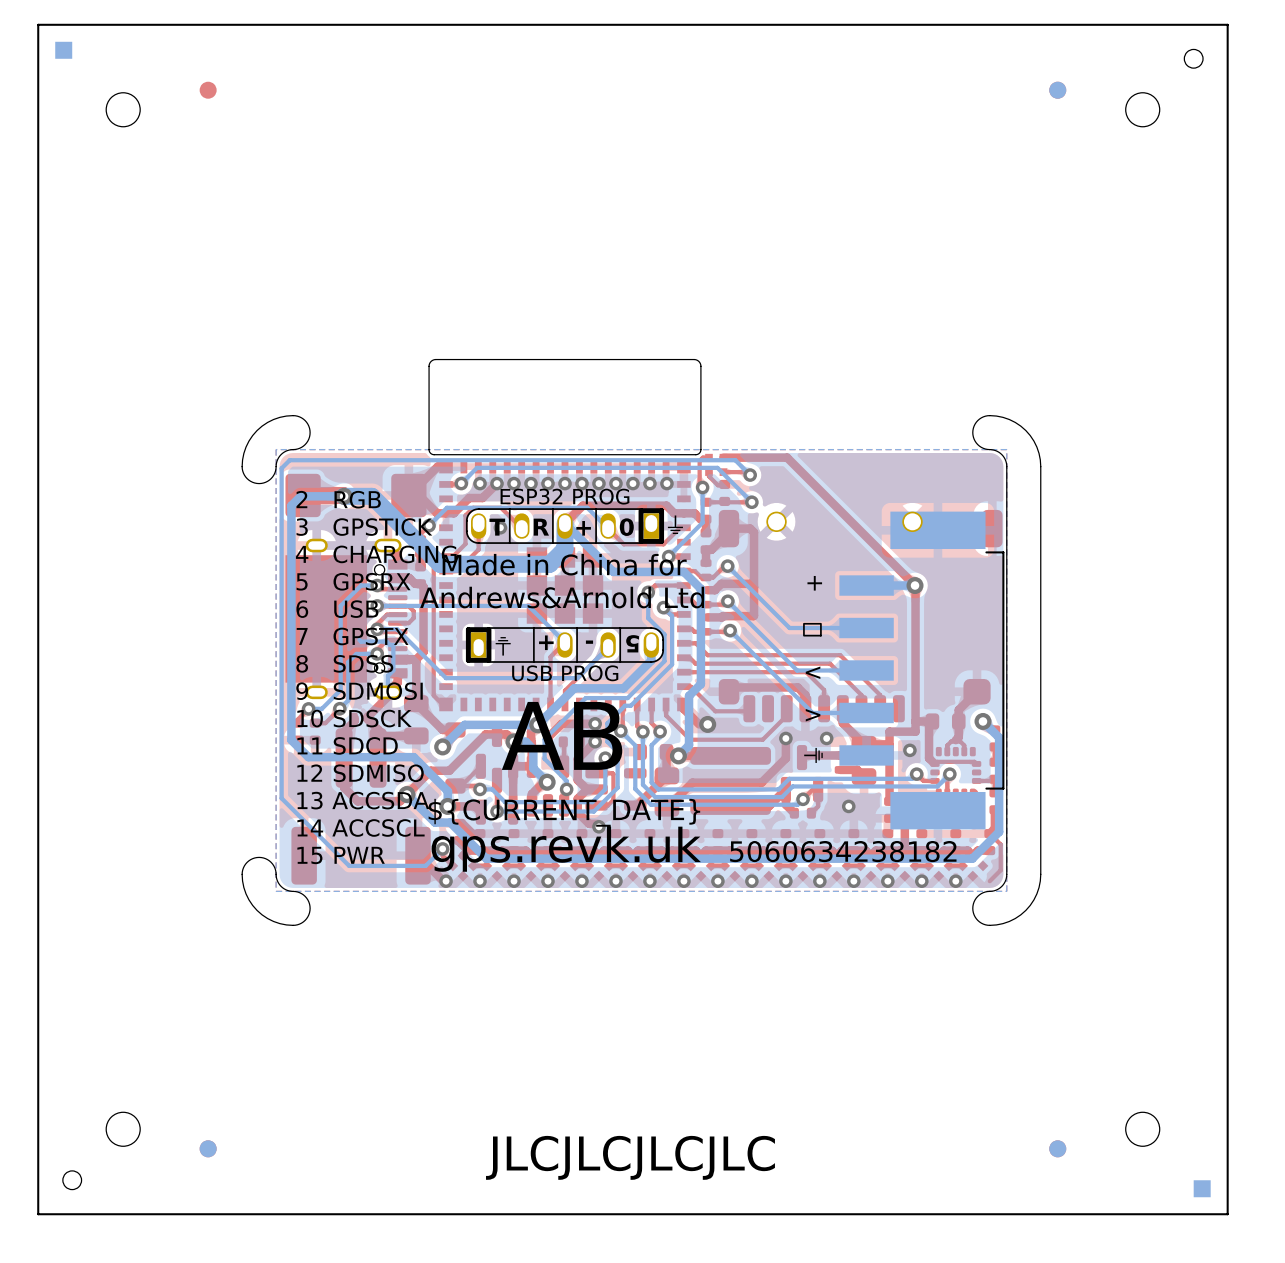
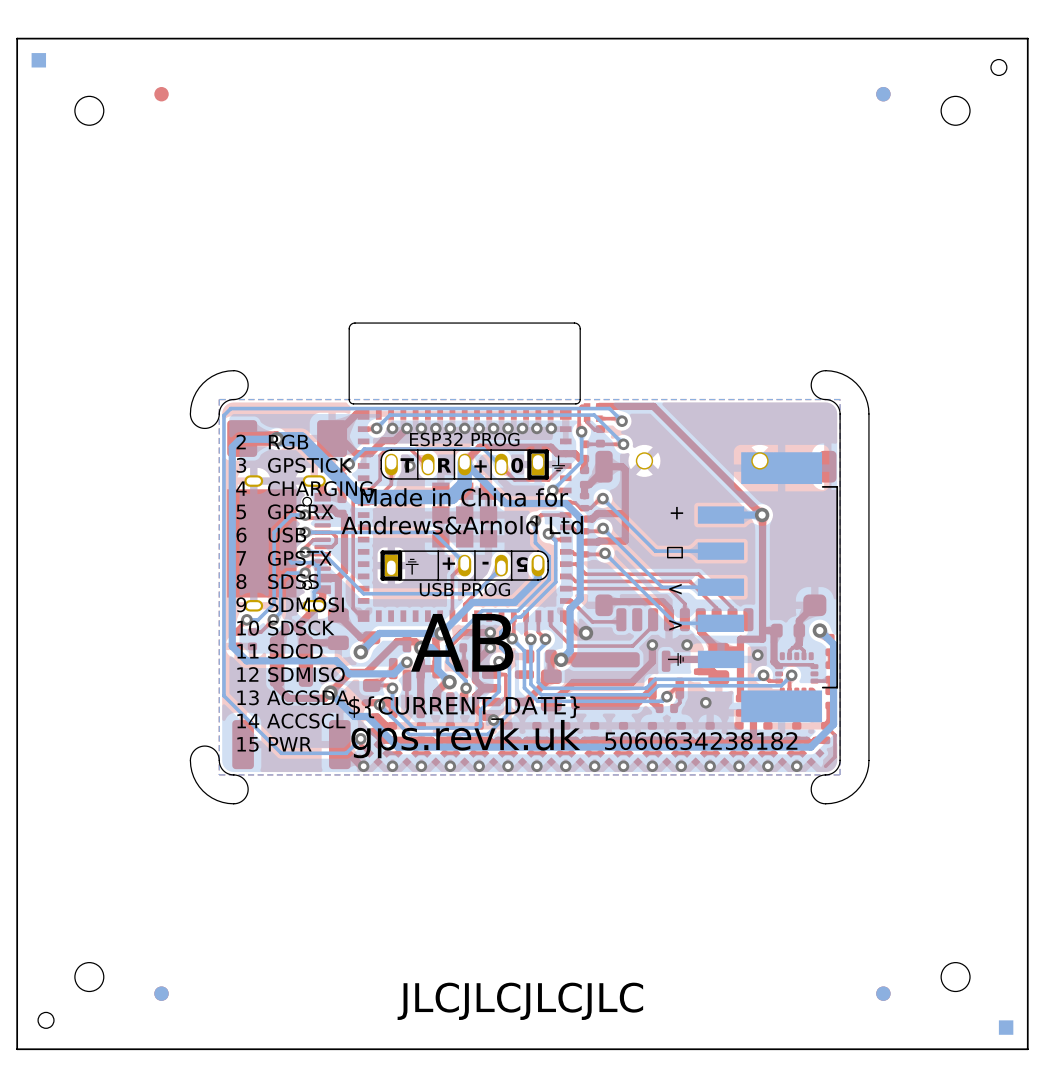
via: none -> (406, 662)
bottom track: (429, 772) (447, 791) (447, 806) -> (349, 673) (394, 673) (406, 662)
bottom track: (617, 787) (593, 811) (497, 811) -> (509, 686) (509, 712) (487, 734) (409, 734) (379, 704)
bottom track: (605, 789) (592, 802) (505, 802) (492, 789) (480, 789) -> (499, 688) (499, 691) (480, 709) (480, 725) (478, 728) (413, 728) (392, 707) (392, 689)
via: (447, 806) -> none
via: none -> (379, 704)
via: (497, 811) -> none

